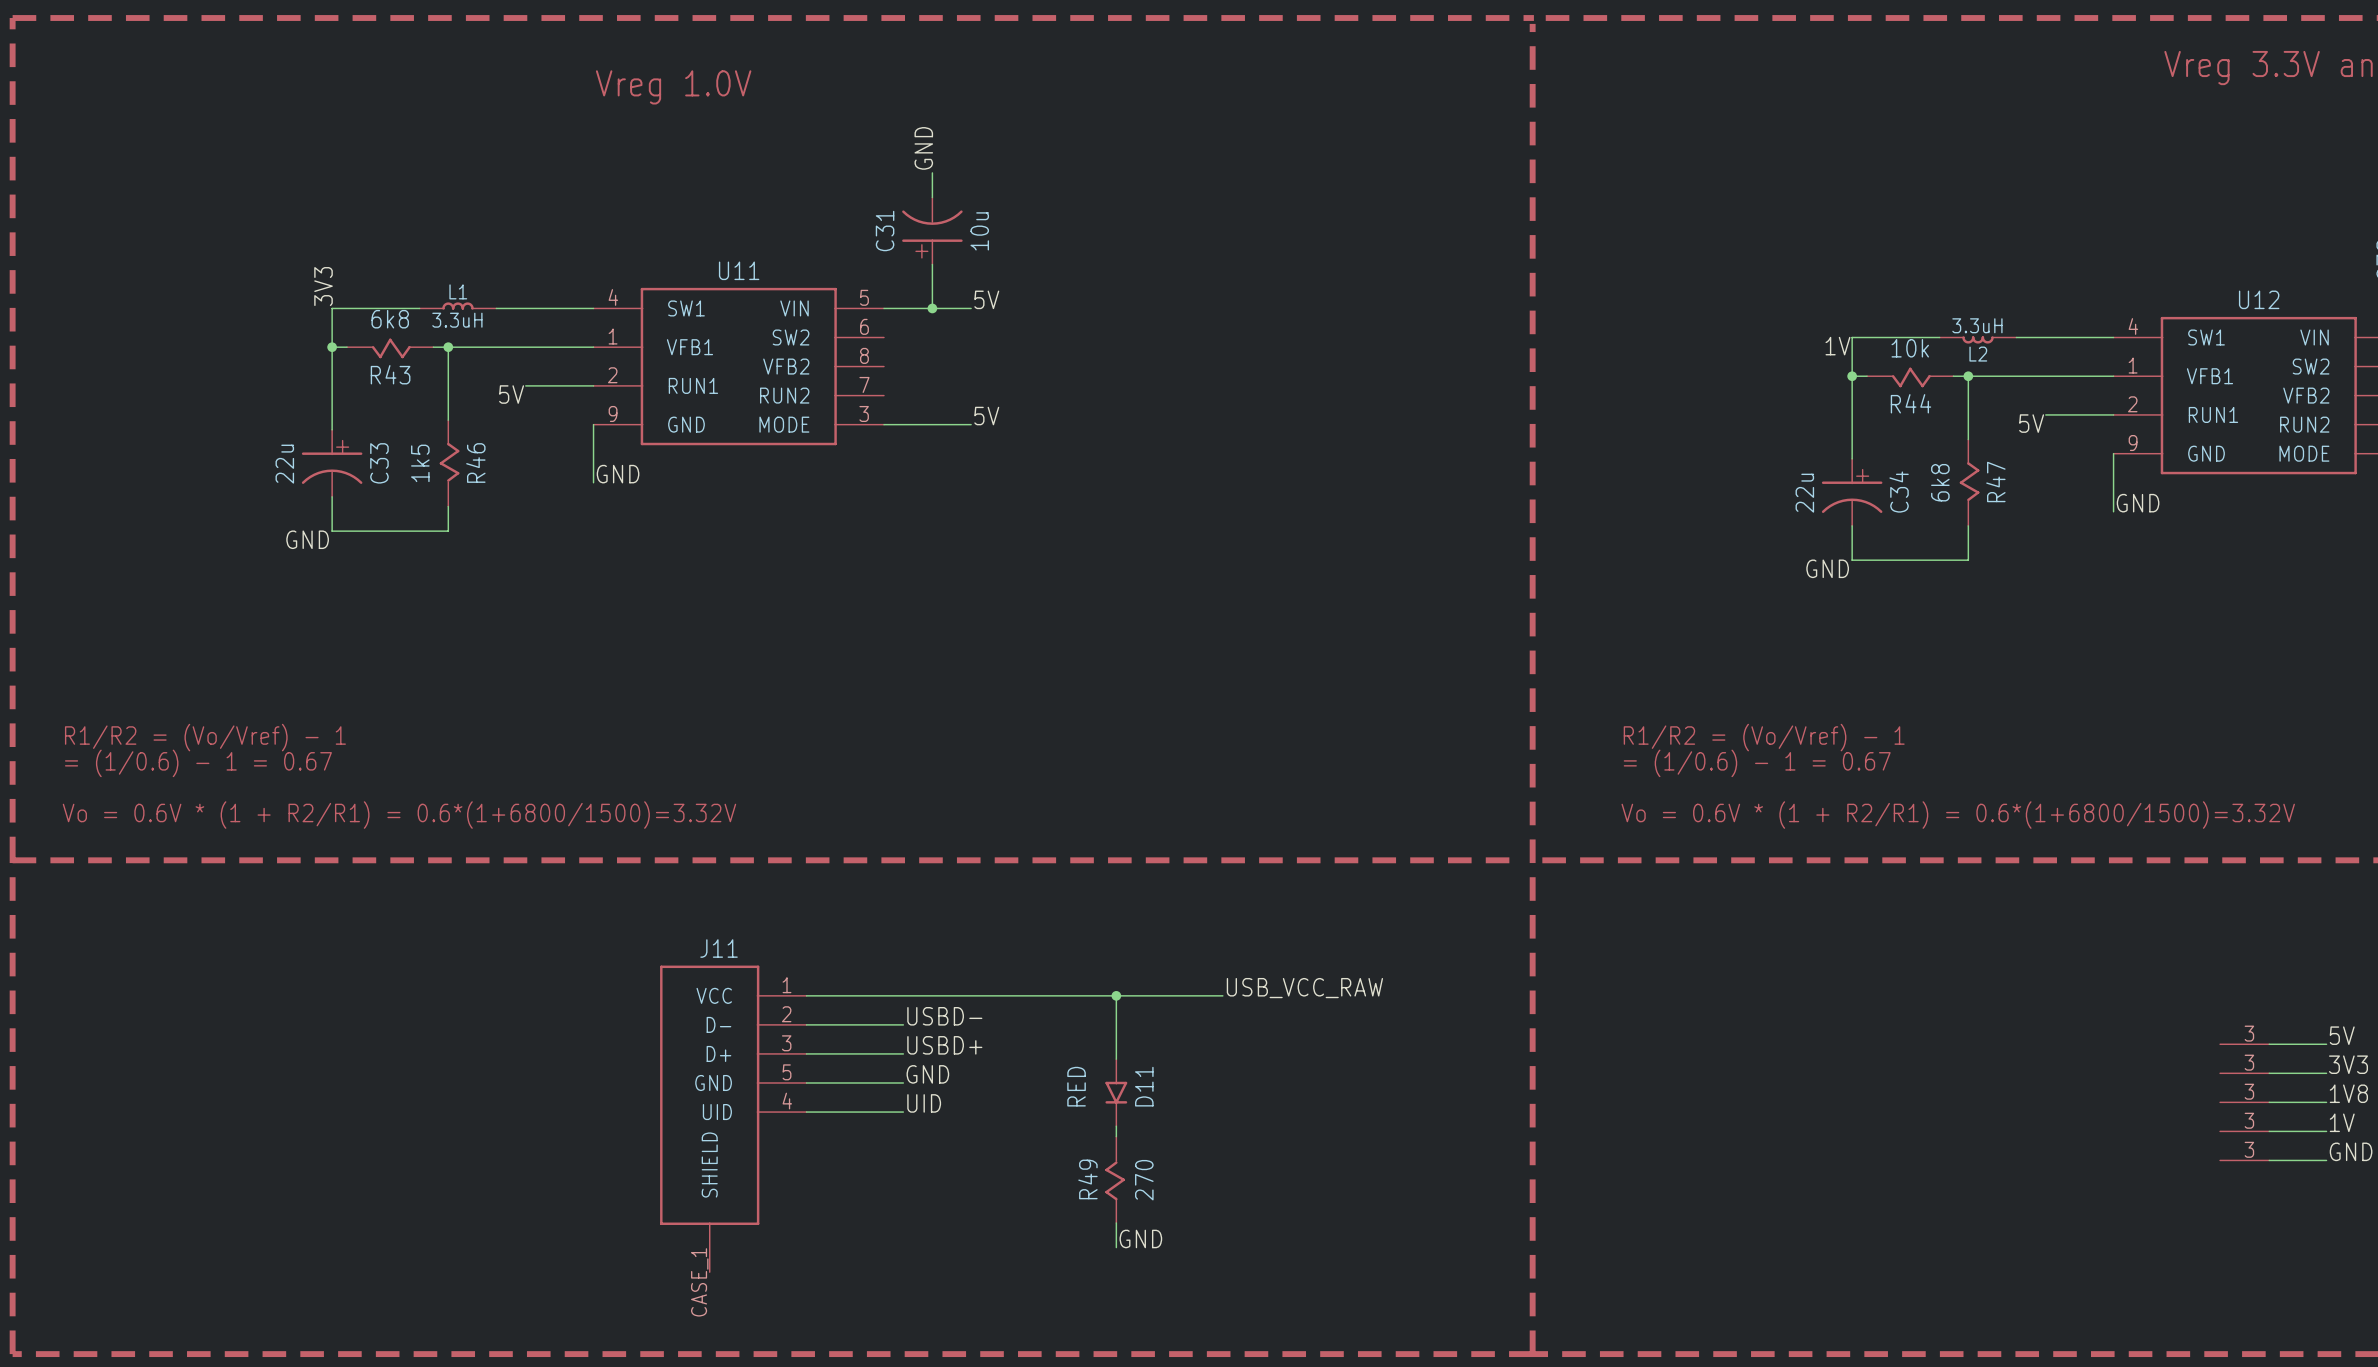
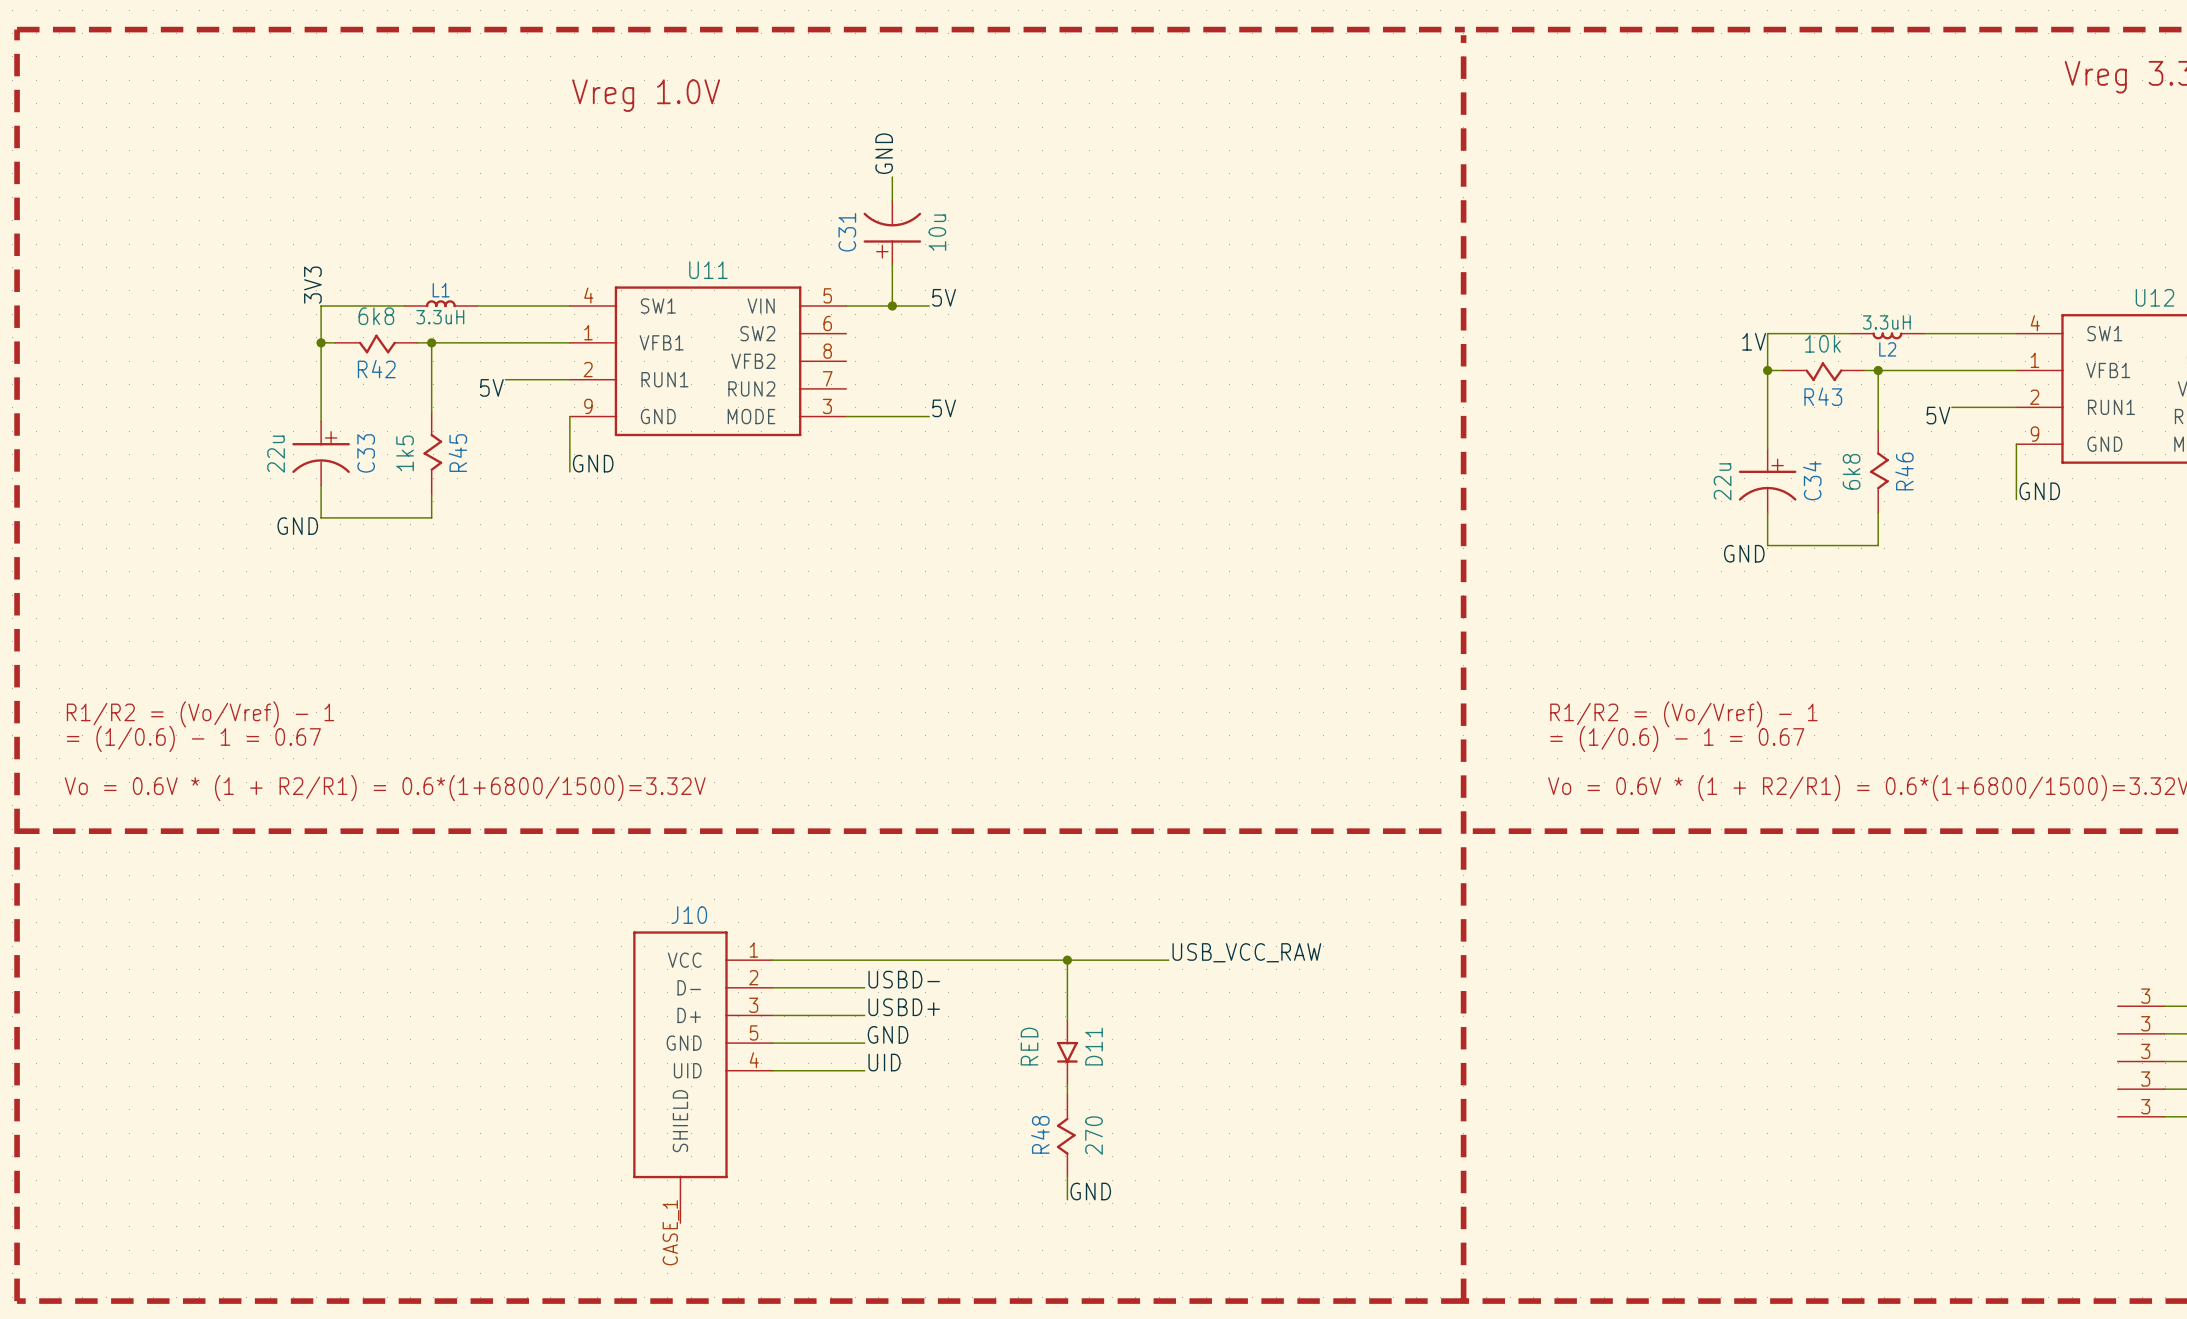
R43 name: R43 (390, 374) -> R42 (376, 369)
R44 name: R44 (1910, 403) -> R43 (1823, 396)
R46 name: R46 (475, 463) -> R45 (457, 453)
R47 name: R47 (1995, 481) -> R46 (1904, 471)
J11 name: J11 (719, 948) -> J10 (689, 915)
R49 name: R49 (1087, 1179) -> R48 (1040, 1134)

